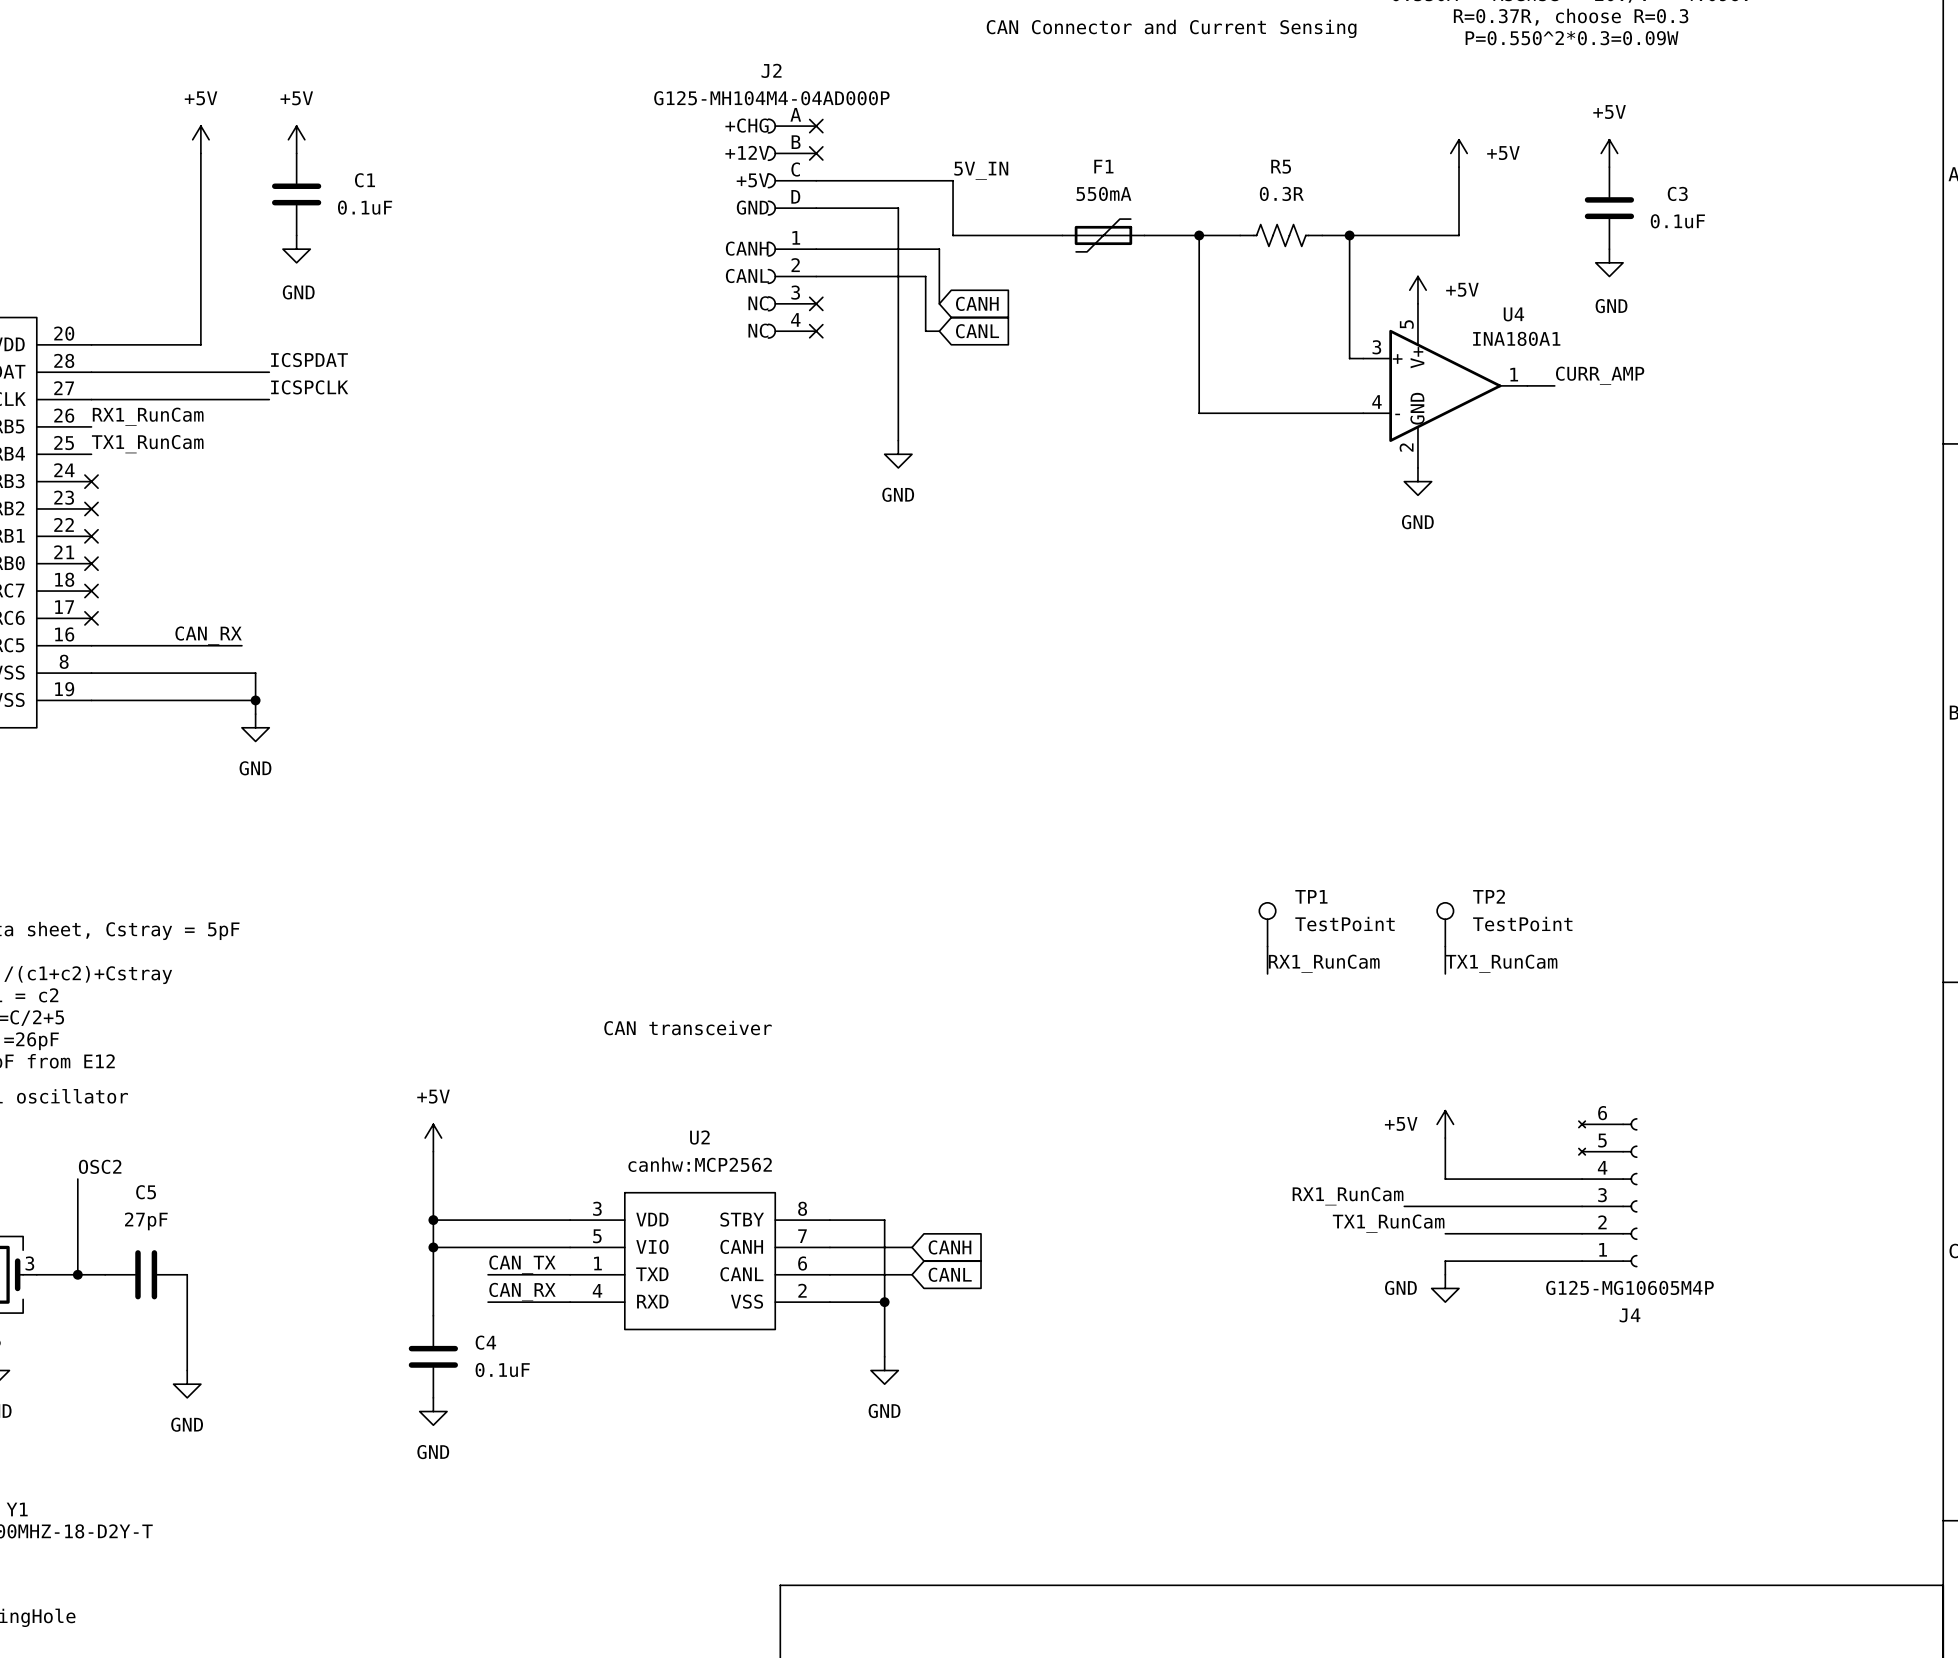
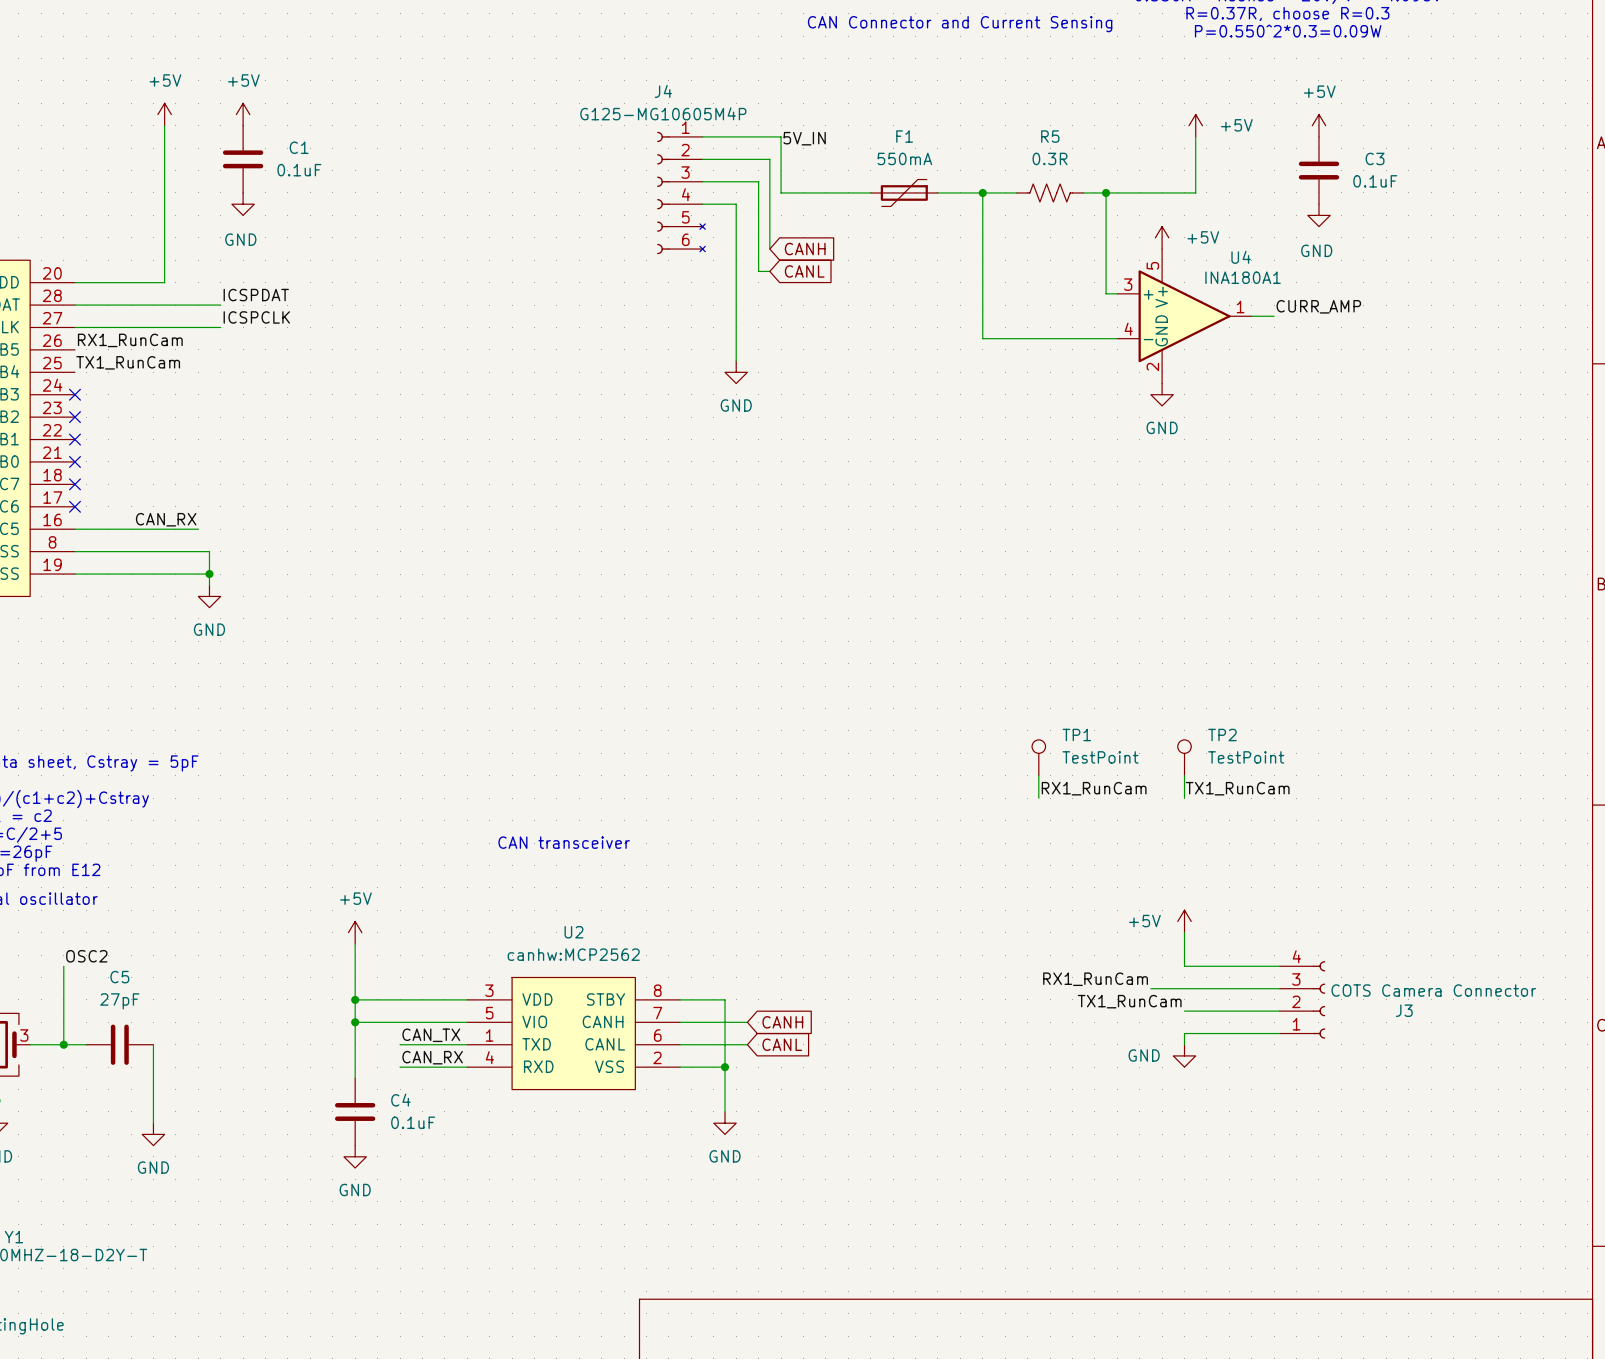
no-connect mark: (816, 126) -> none
no-connect mark: (816, 153) -> none
wire: (816, 180) (953, 180) -> (702, 136) (781, 136) (781, 148)
wire: (816, 208) (898, 208) (898, 249) (939, 249) -> (702, 159) (769, 159) (769, 204)
J2: G125-MH104M4-04AD000P (792, 228) -> none
wire: (816, 276) (925, 276) -> (702, 181) (758, 181) (758, 226)
no-connect mark: (816, 303) -> none
no-connect mark: (816, 331) -> none
J4 rotation: 0° (1608, 1192) -> 180° (681, 192)
J4 position: (1608, 1192) -> (681, 192)
J3: none -> COTS Camera Connector (1302, 999)

